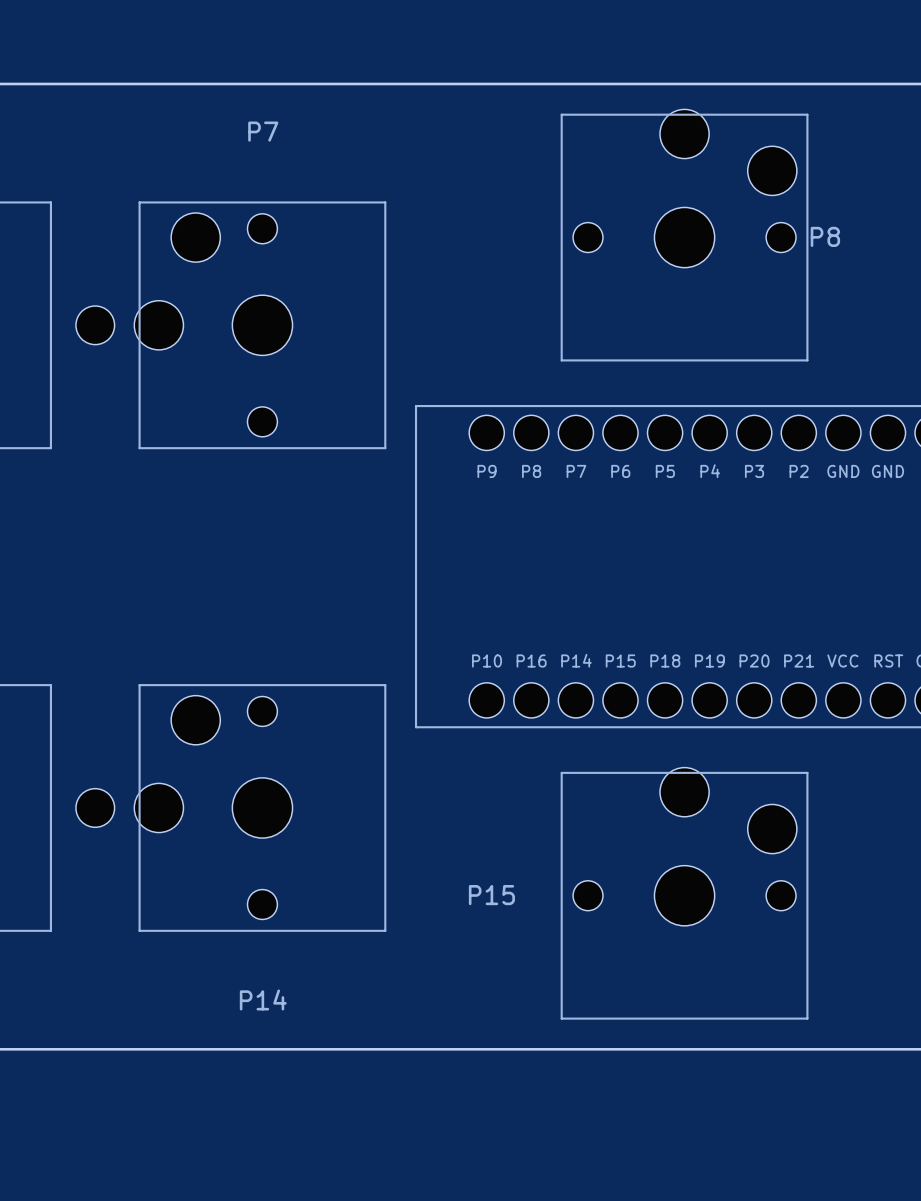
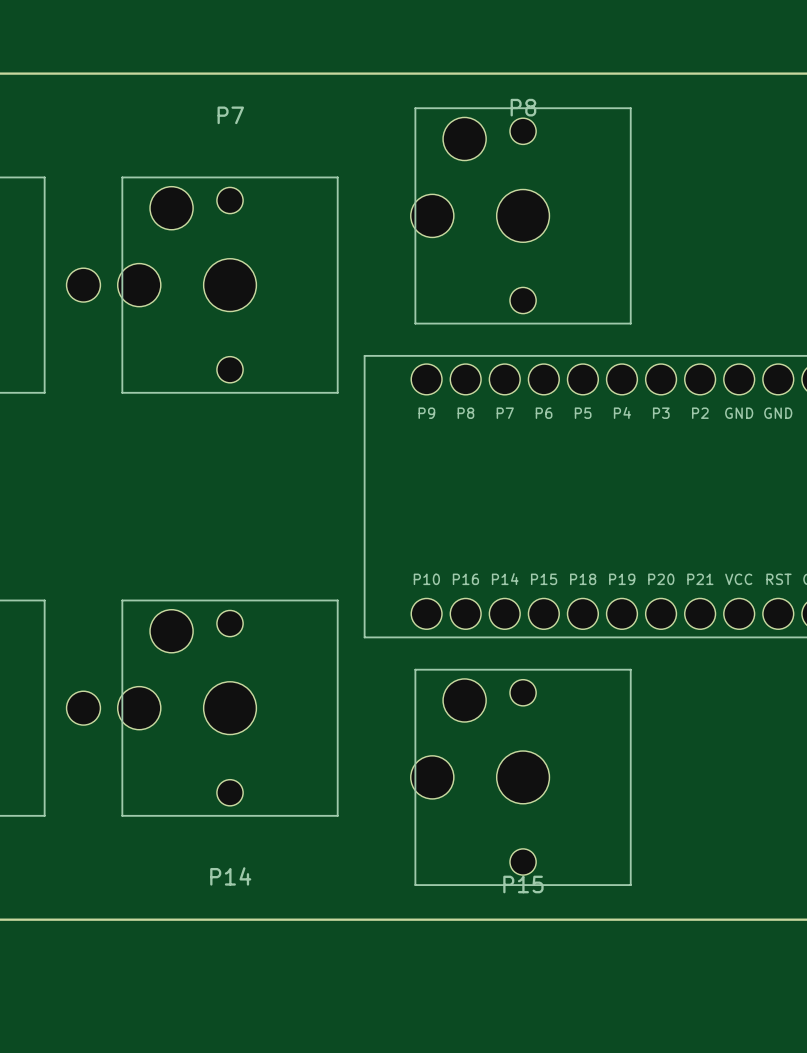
part: (684, 235) -> none
part: none -> (521, 215)
part: none -> (521, 777)
part: (684, 893) -> none

